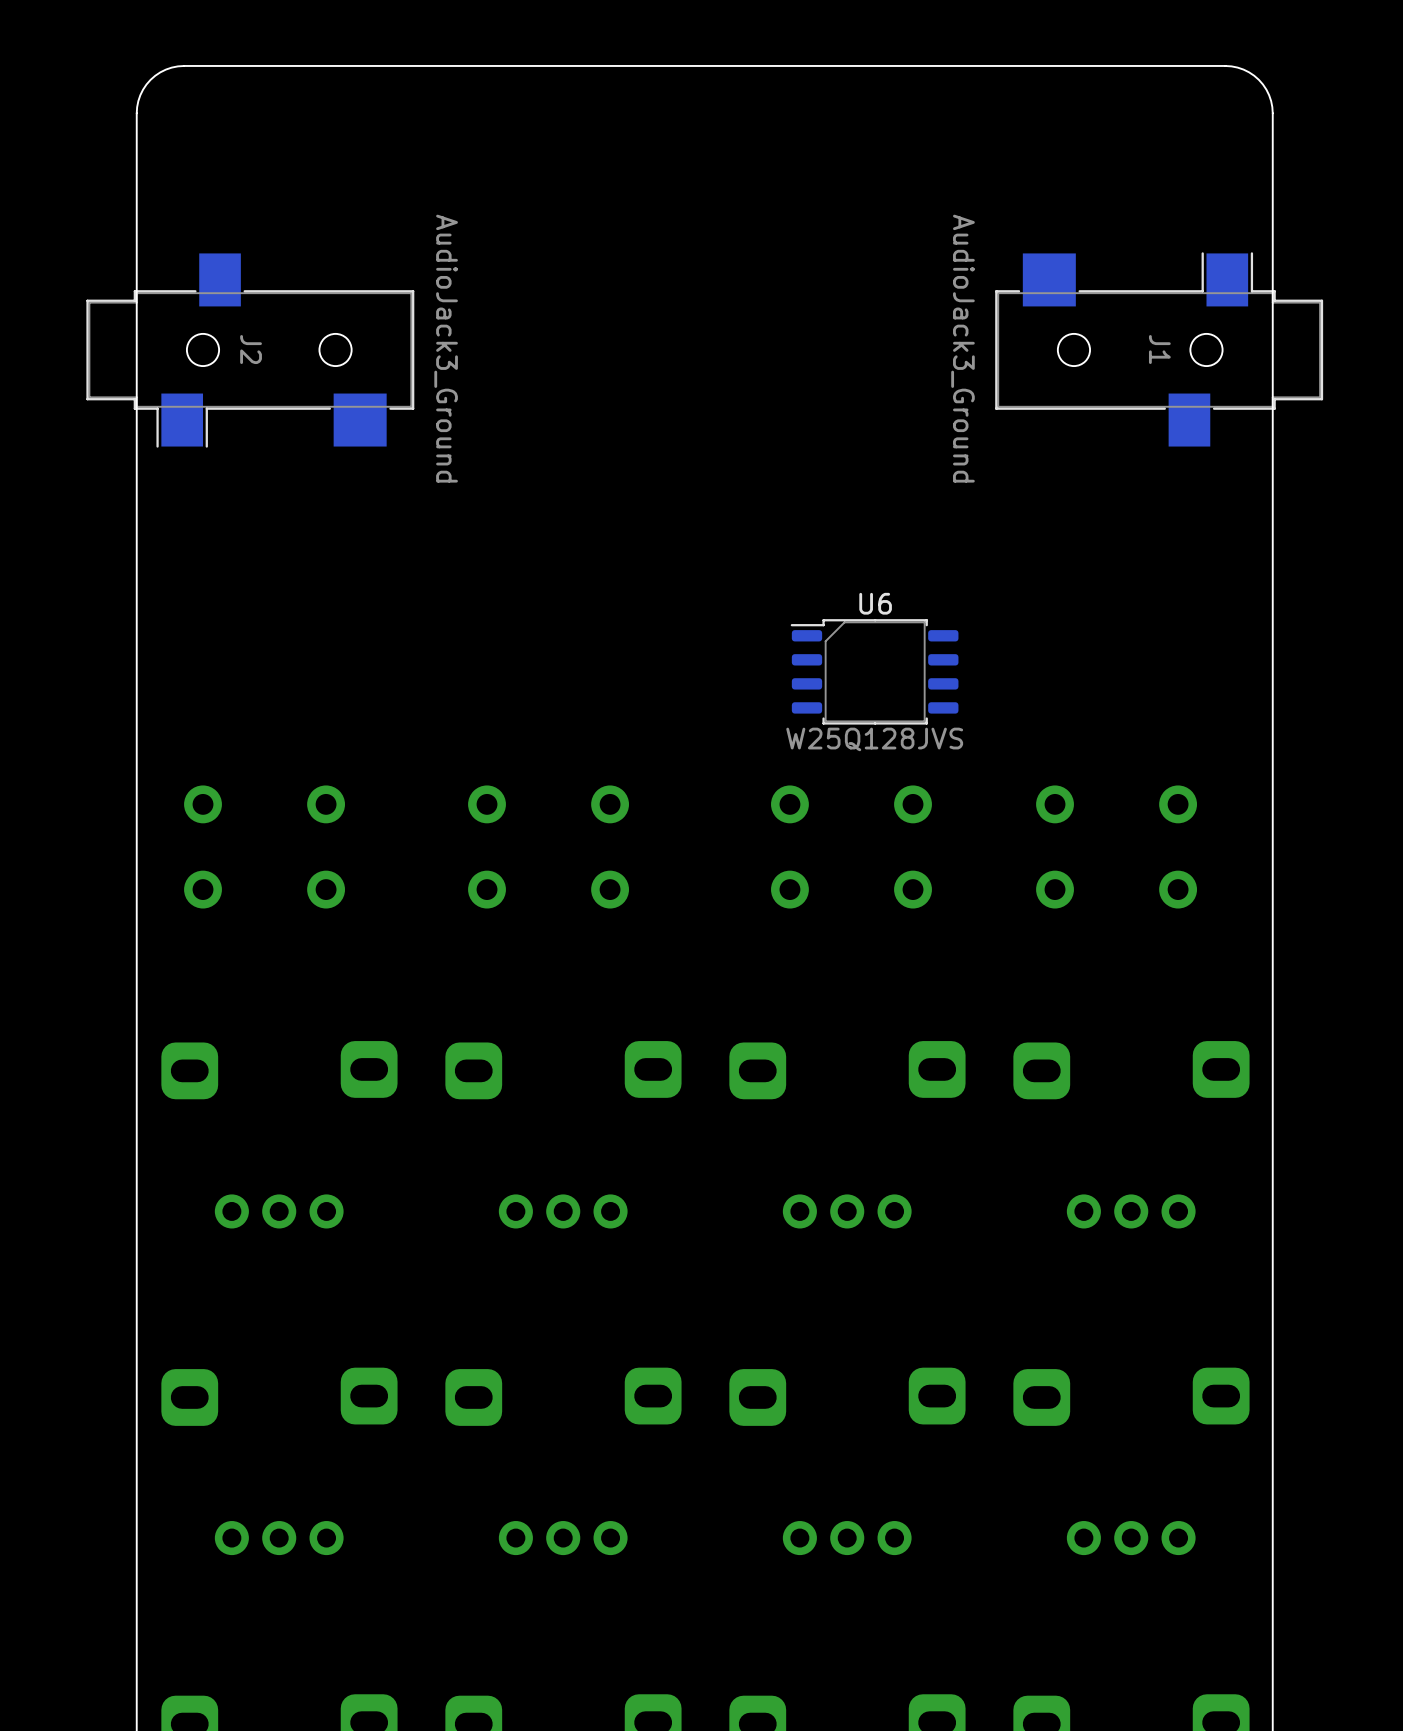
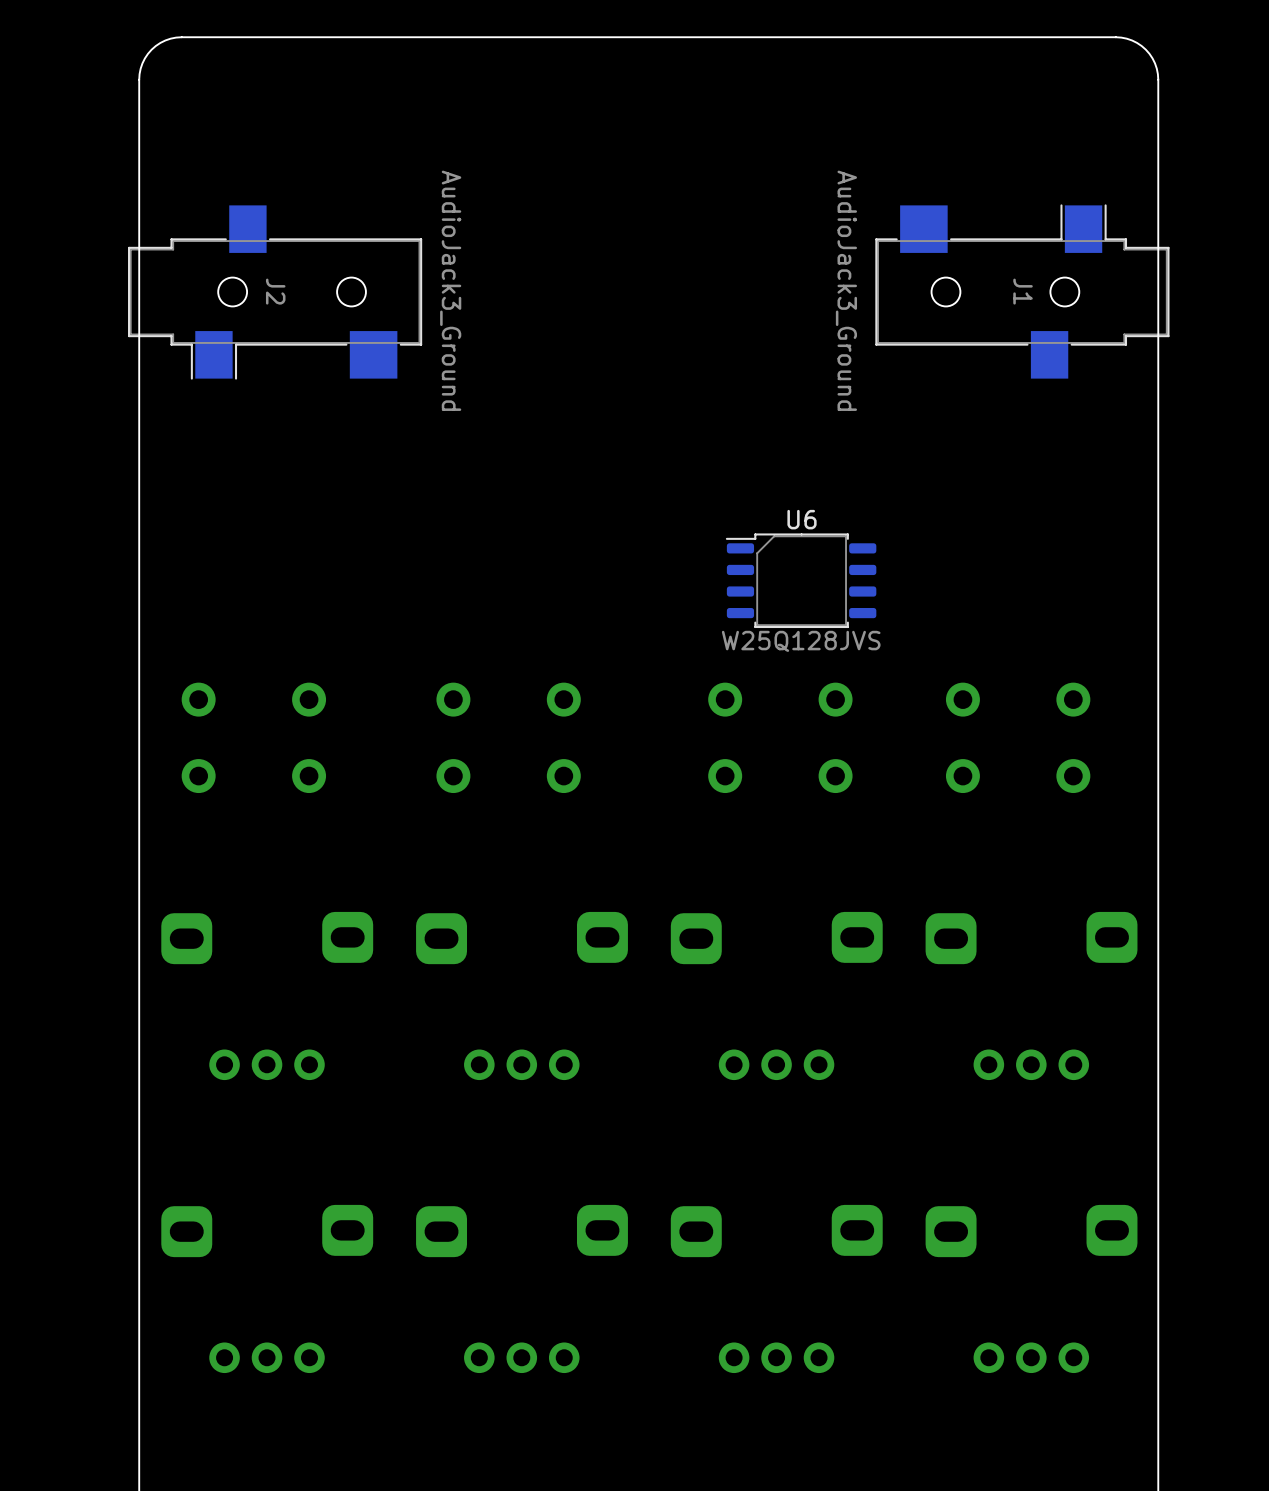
J1 position: (1159, 349) -> (1022, 291)
J2 position: (250, 350) -> (275, 292)

